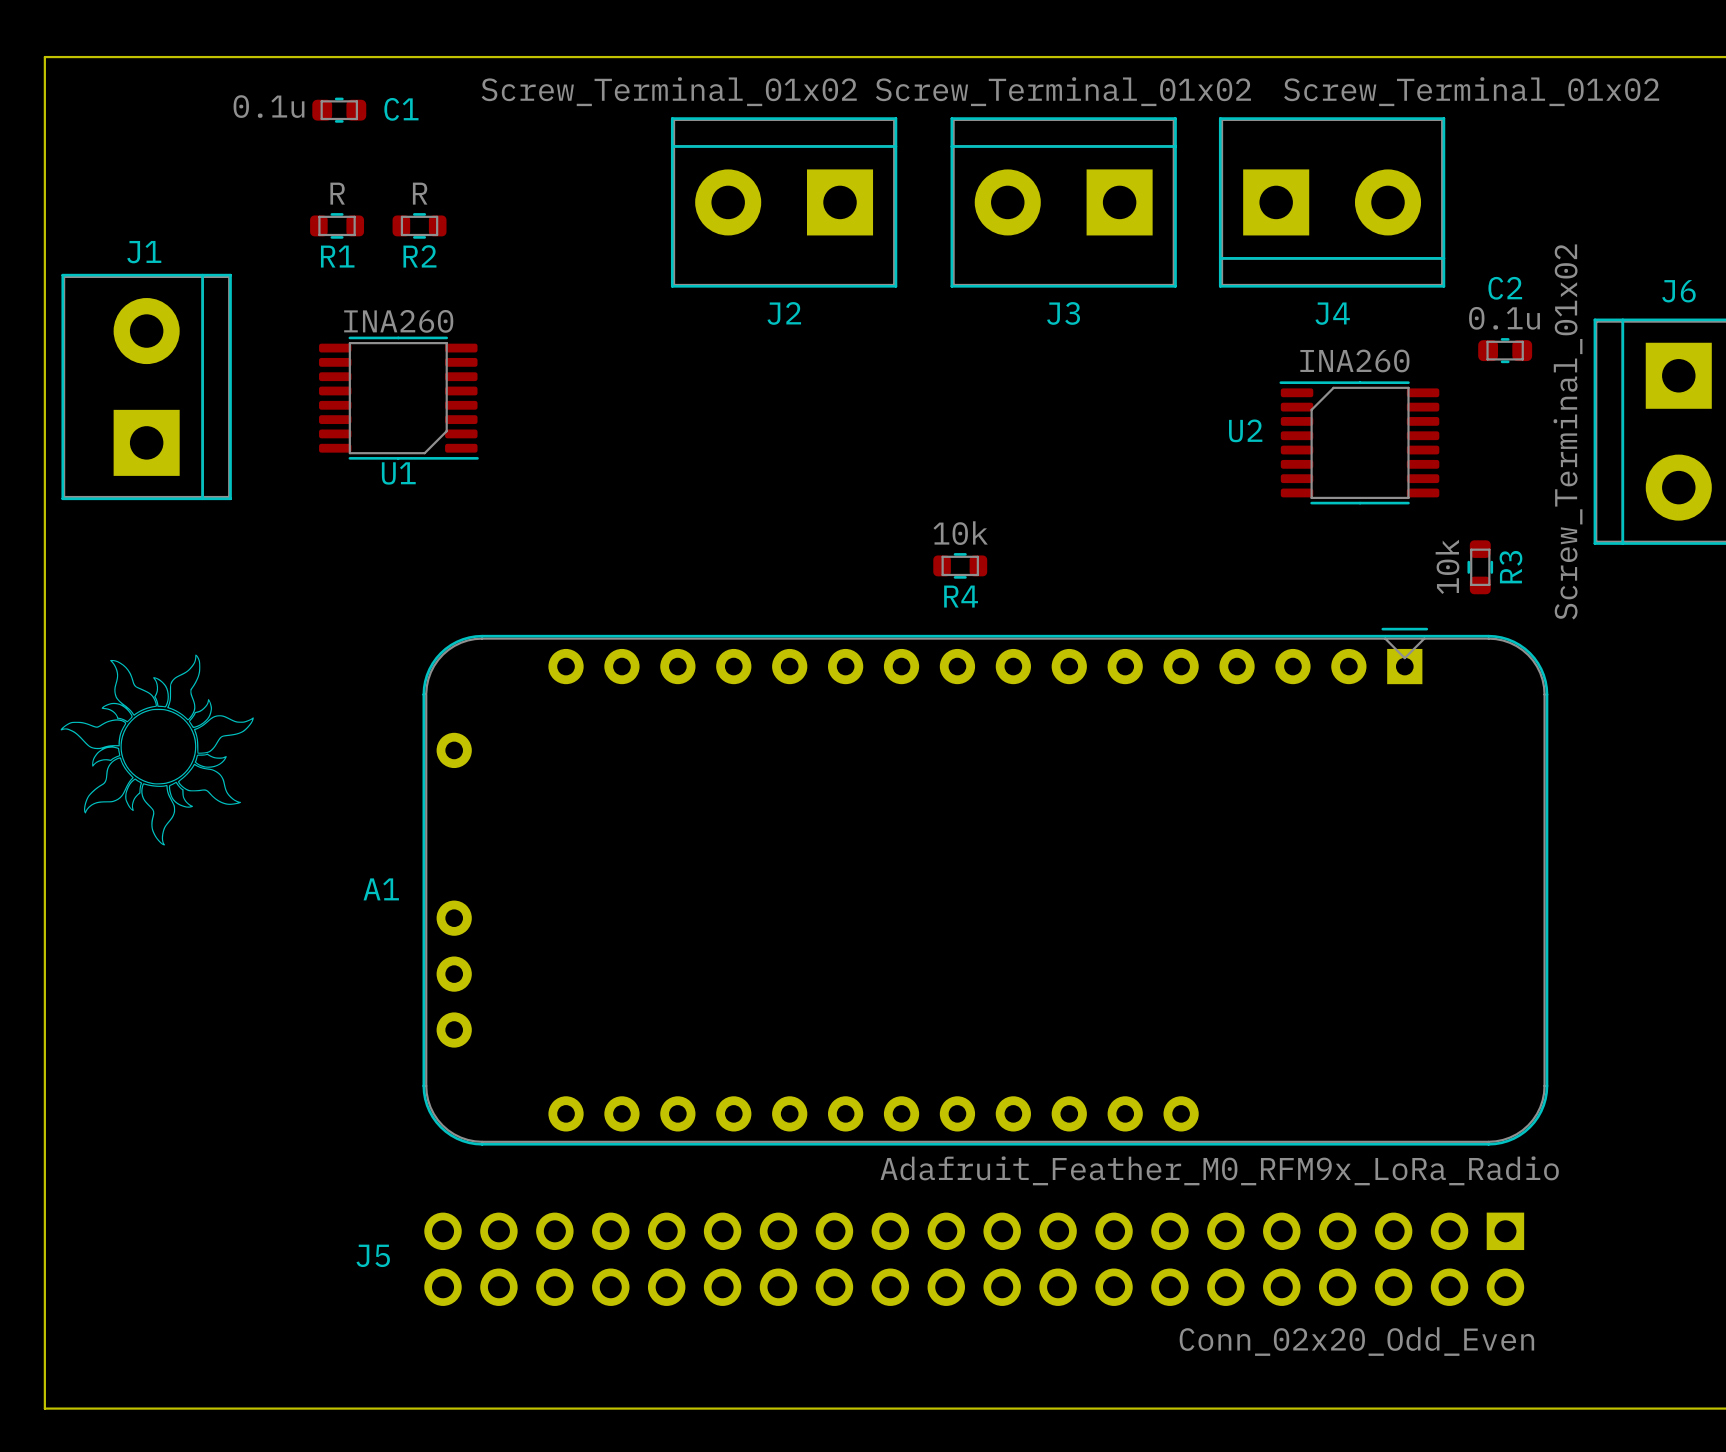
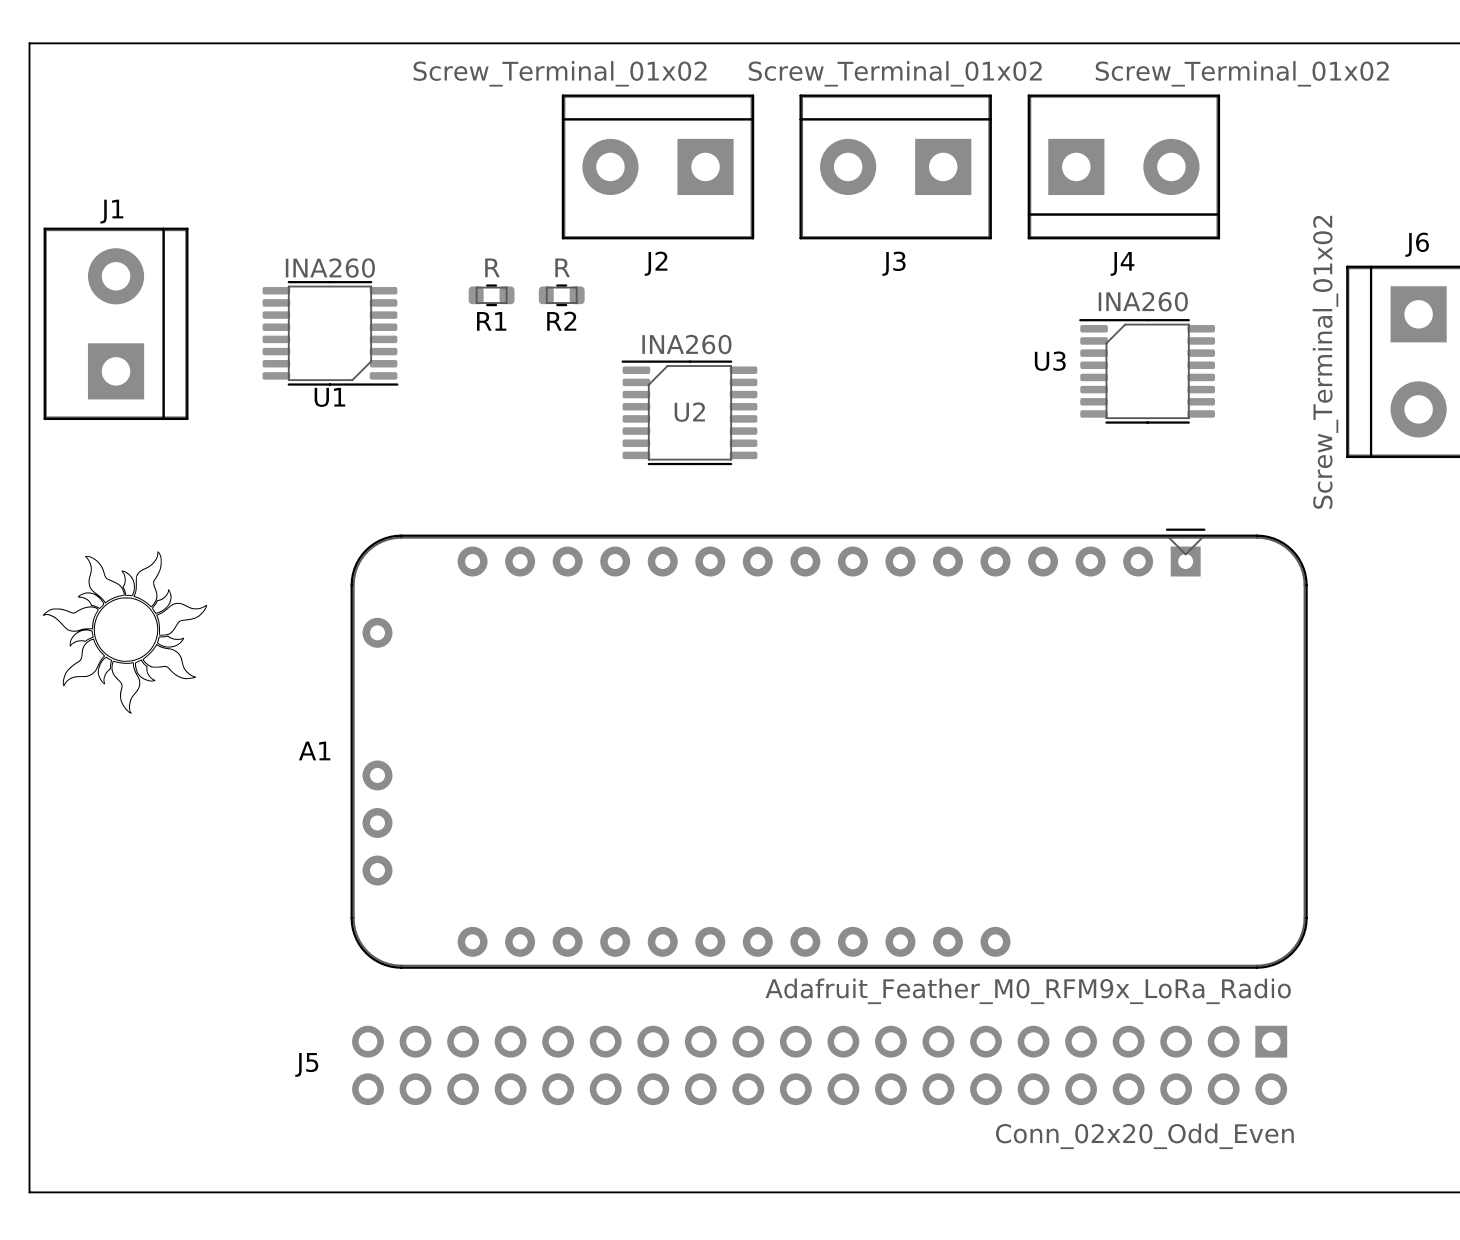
C1: 0.1u (339, 110) -> none
R1 position: (337, 225) -> (491, 295)
R2 position: (419, 225) -> (561, 295)
C2: 0.1u (1505, 350) -> none
U2 name: U2 (1245, 430) -> U3 (1050, 361)
U2: none -> INA260 (689, 412)
R4: 10k (960, 565) -> none
R3: 10k (1480, 567) -> none

